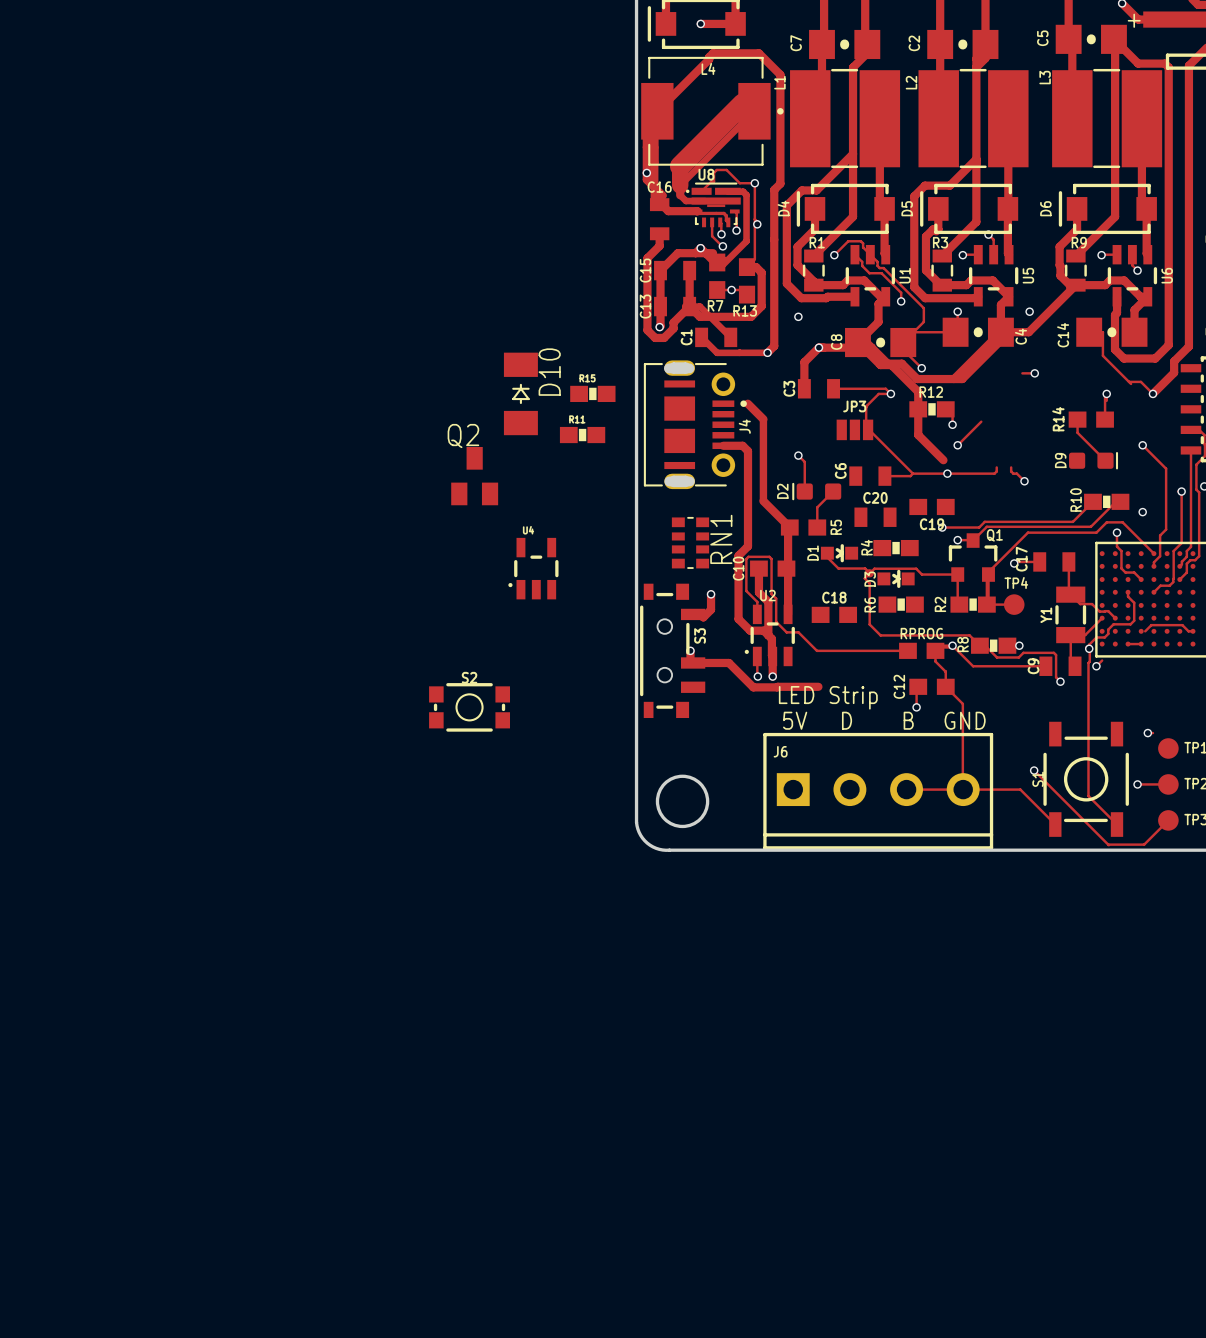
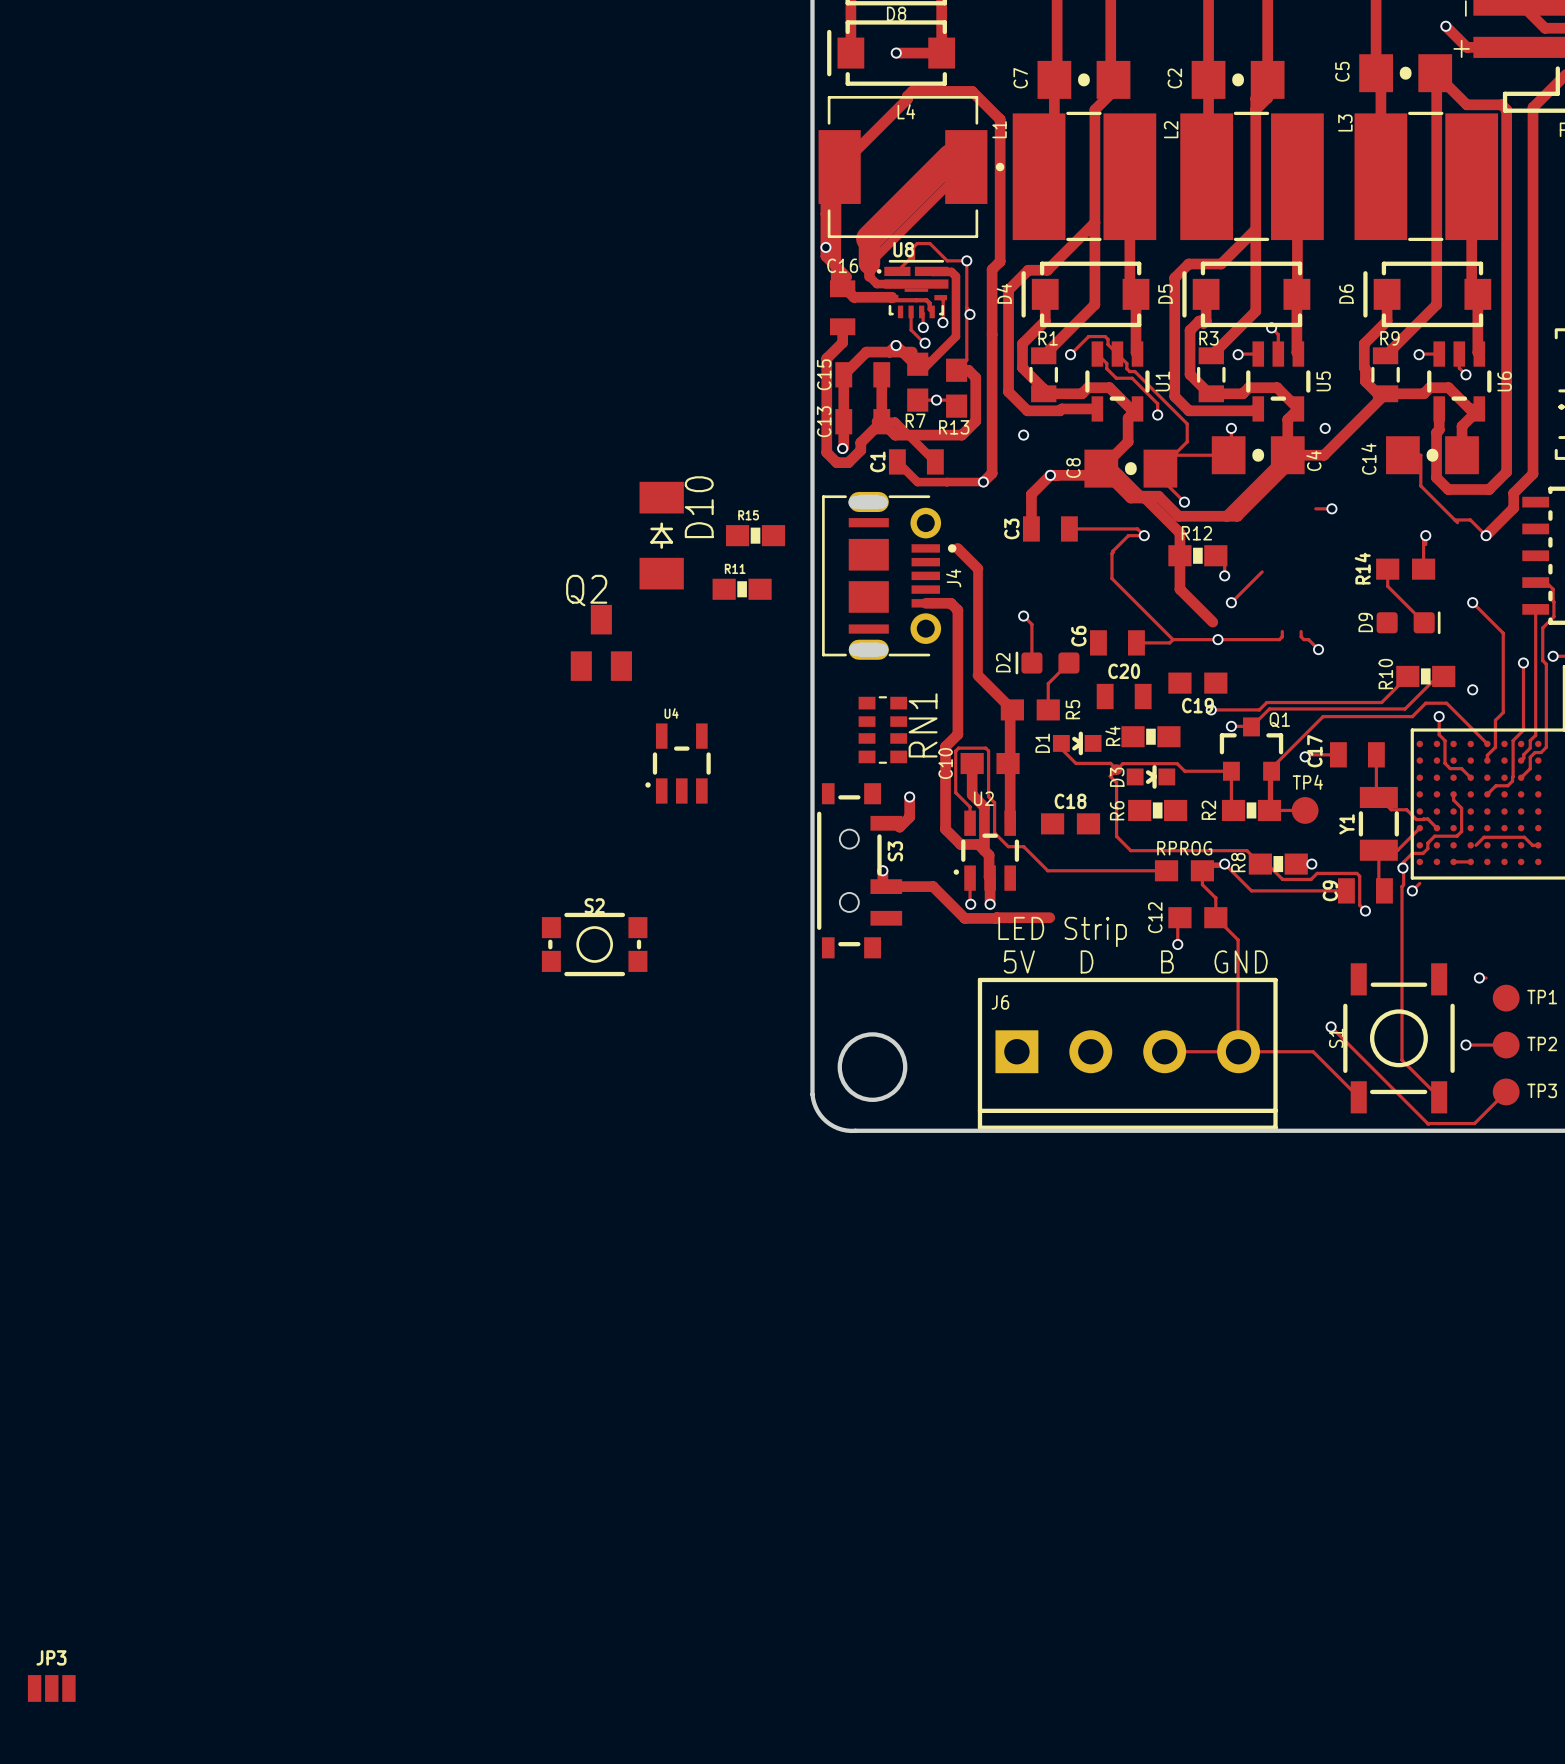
JP3 position: (854, 429) -> (51, 1688)

